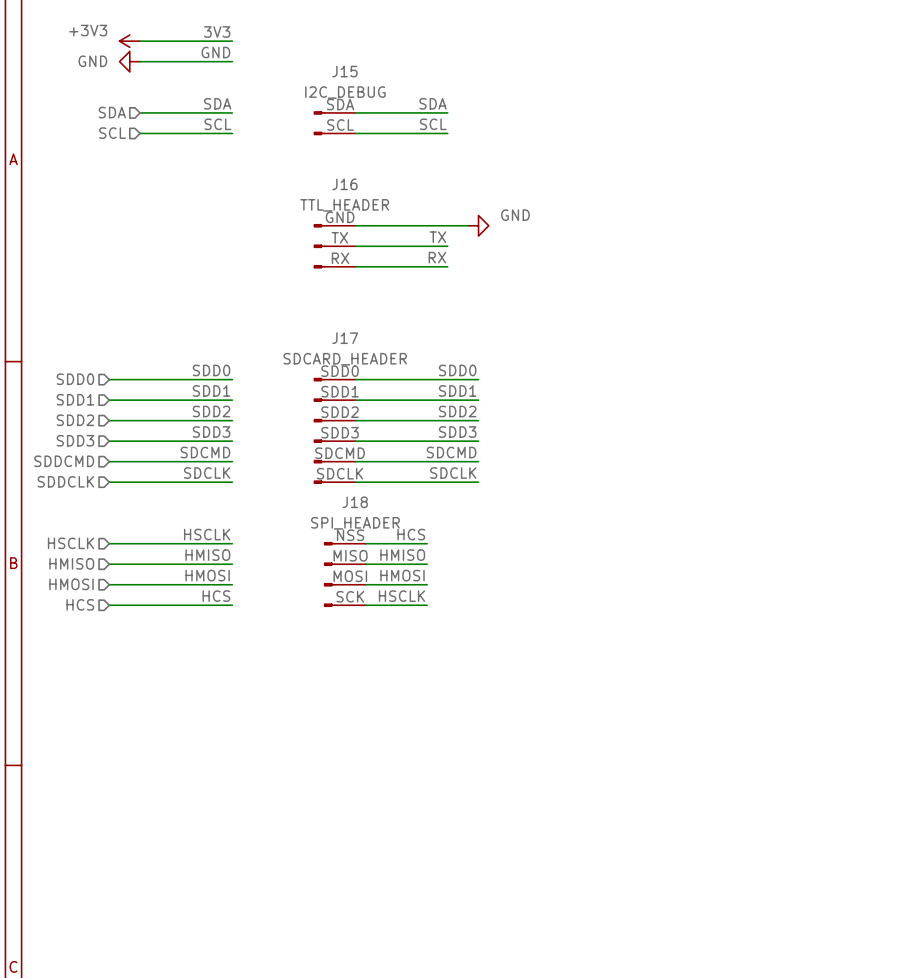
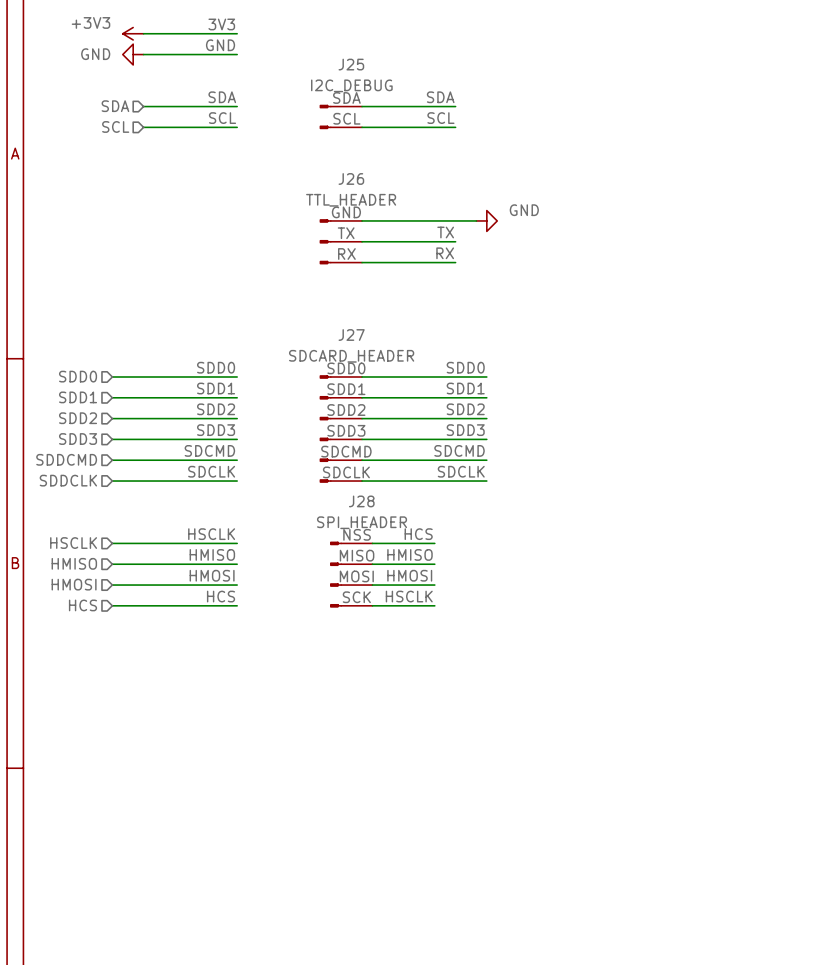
J15 name: J15 (344, 71) -> J25 (351, 64)
J16 name: J16 (344, 184) -> J26 (351, 178)
J17 name: J17 (345, 338) -> J27 (351, 335)
J18 name: J18 (355, 502) -> J28 (361, 501)

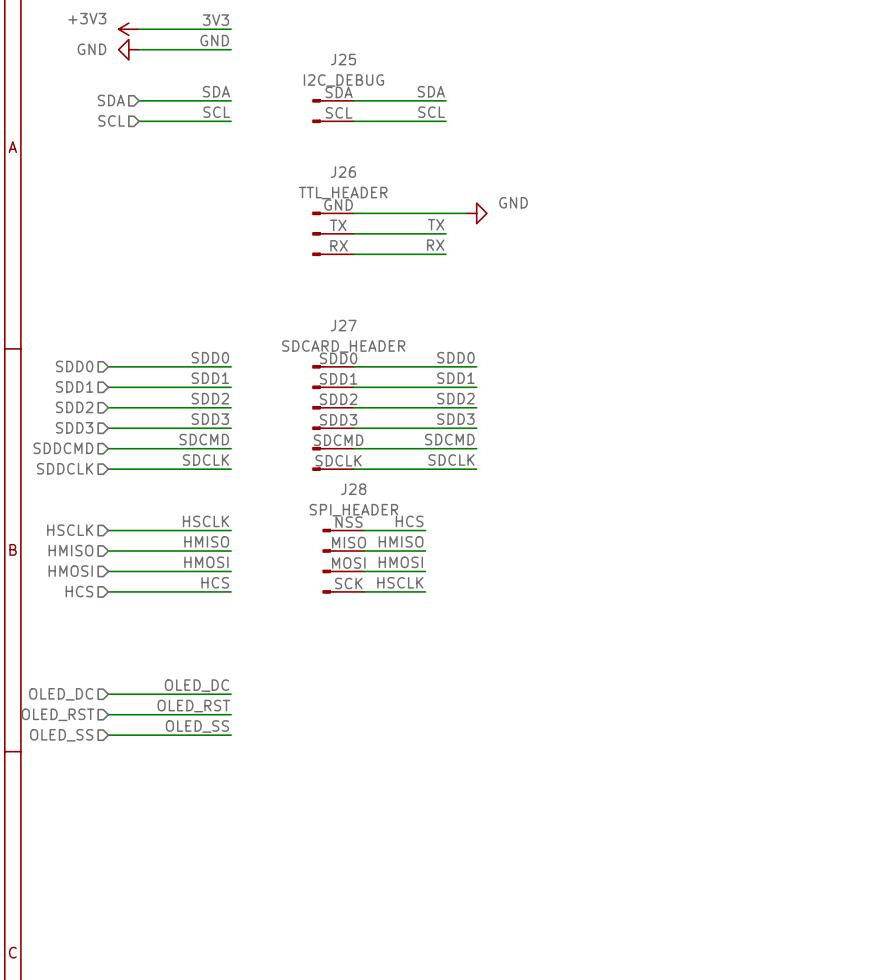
label: none -> OLED_DC (196, 685)
hierarchical label: none -> OLED_DC (61, 694)
wire: none -> (108, 694) (231, 694)
label: none -> OLED_RST (193, 706)
hierarchical label: none -> OLED_RST (58, 714)
wire: none -> (108, 714) (231, 714)
label: none -> OLED_SS (197, 726)
hierarchical label: none -> OLED_SS (61, 735)
wire: none -> (108, 735) (231, 735)

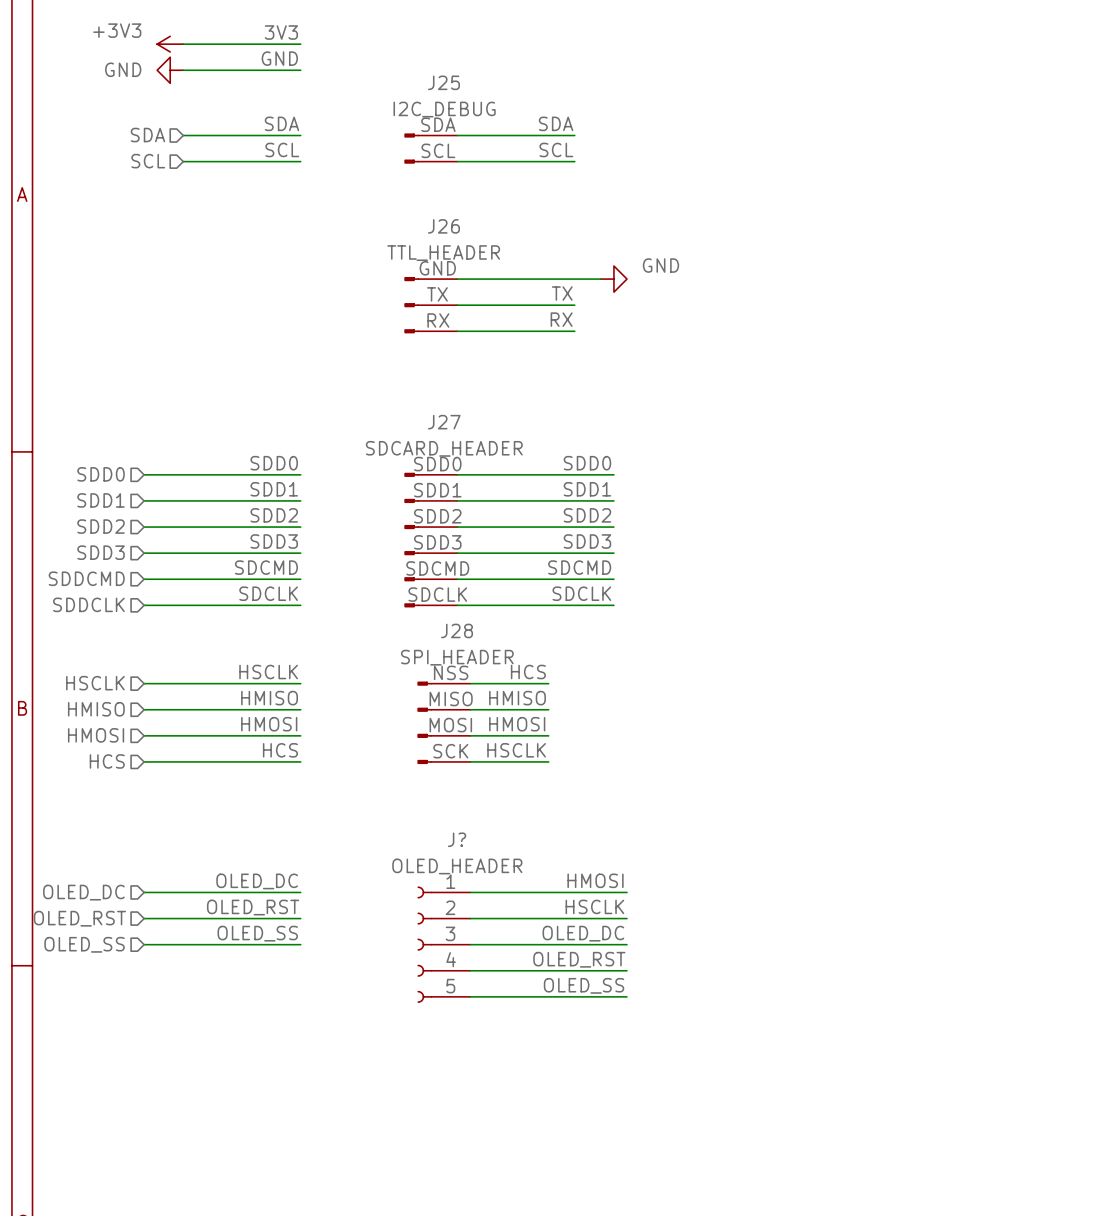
label: none -> HMOSI (595, 880)
wire: none -> (470, 892) (627, 892)
label: none -> HSCLK (594, 906)
wire: none -> (470, 918) (627, 918)
label: none -> OLED_DC (583, 933)
J?: none -> OLED_HEADER (443, 944)
wire: none -> (470, 944) (627, 944)
label: none -> OLED_RST (579, 959)
wire: none -> (470, 970) (627, 970)
label: none -> OLED_SS (584, 985)
wire: none -> (470, 996) (627, 996)

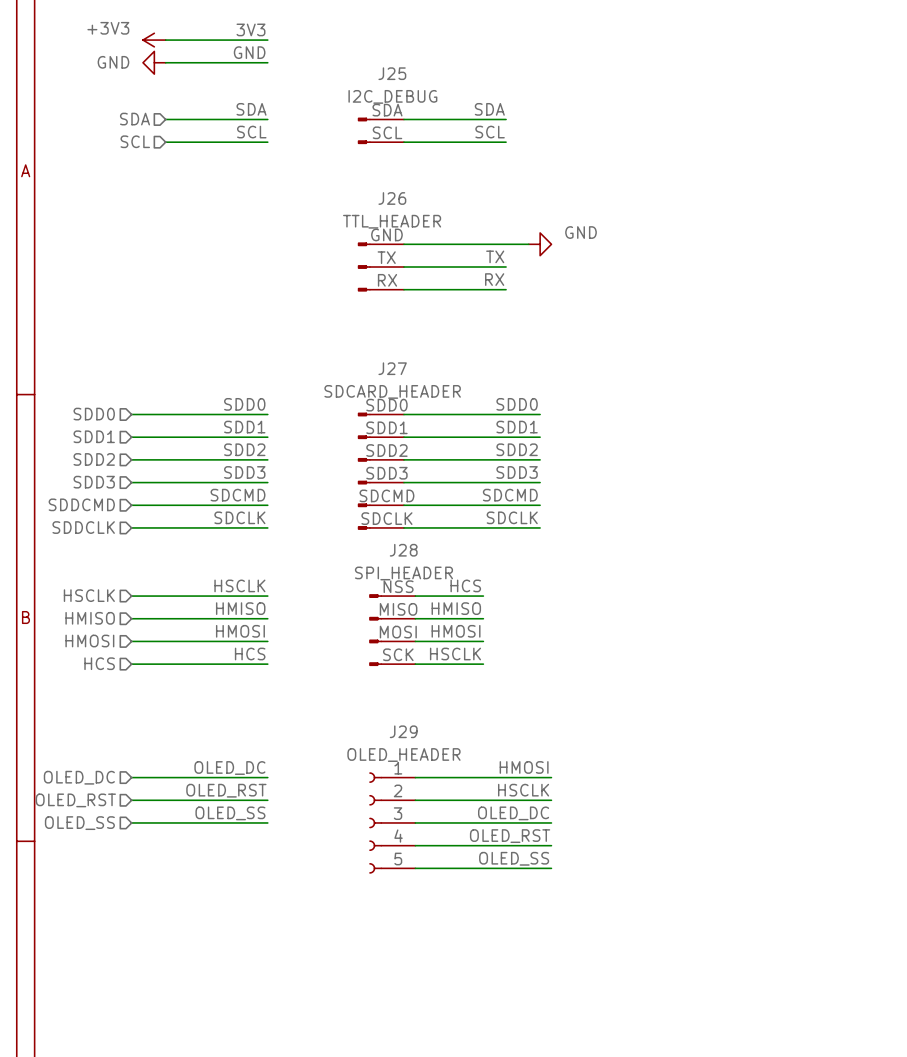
J? name: J? (457, 839) -> J29 (403, 731)

